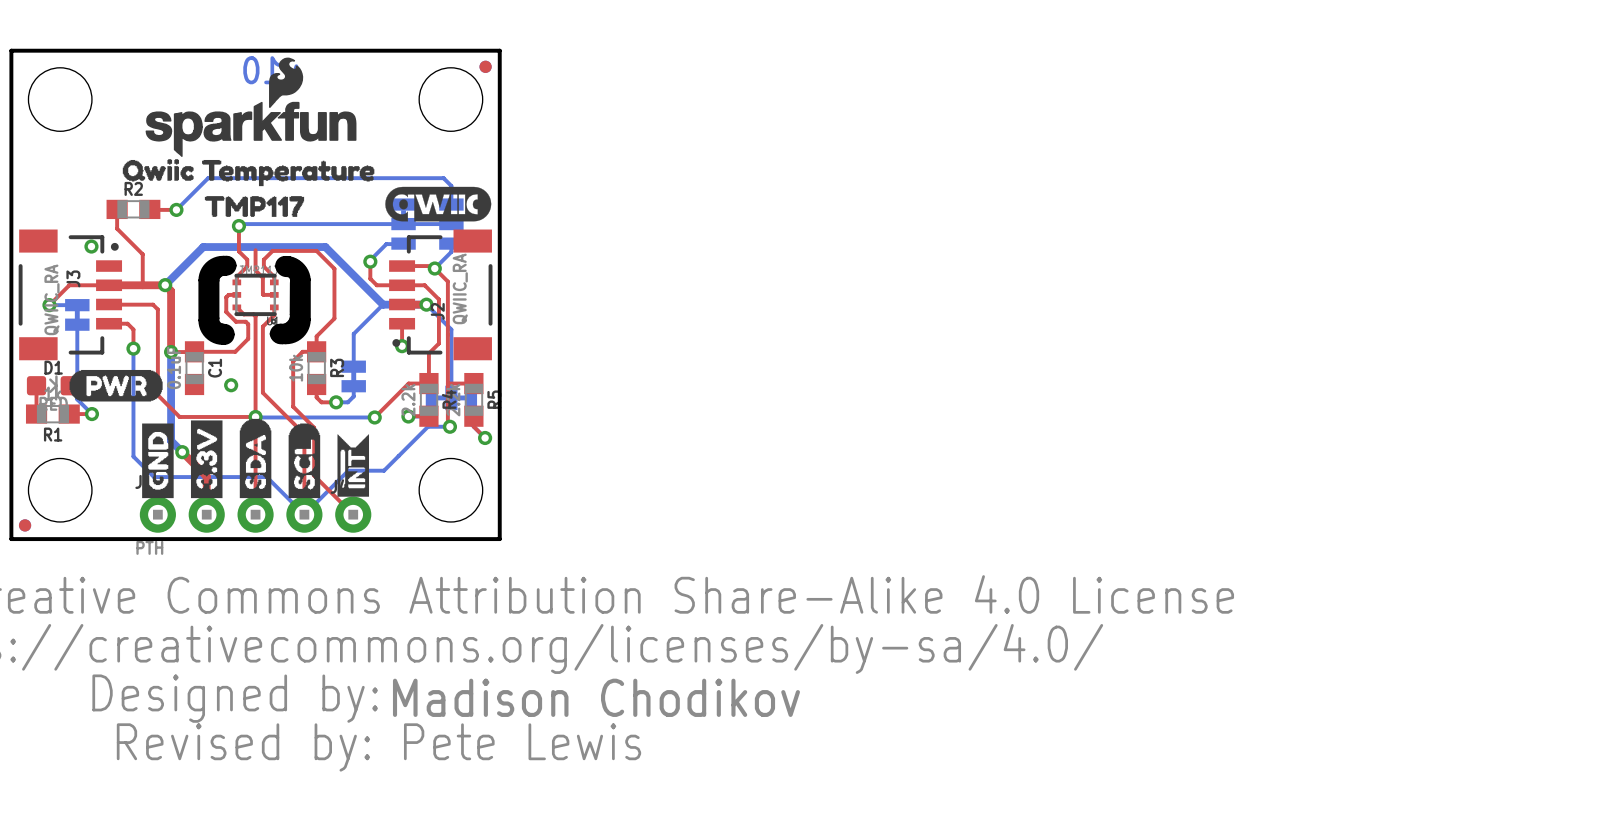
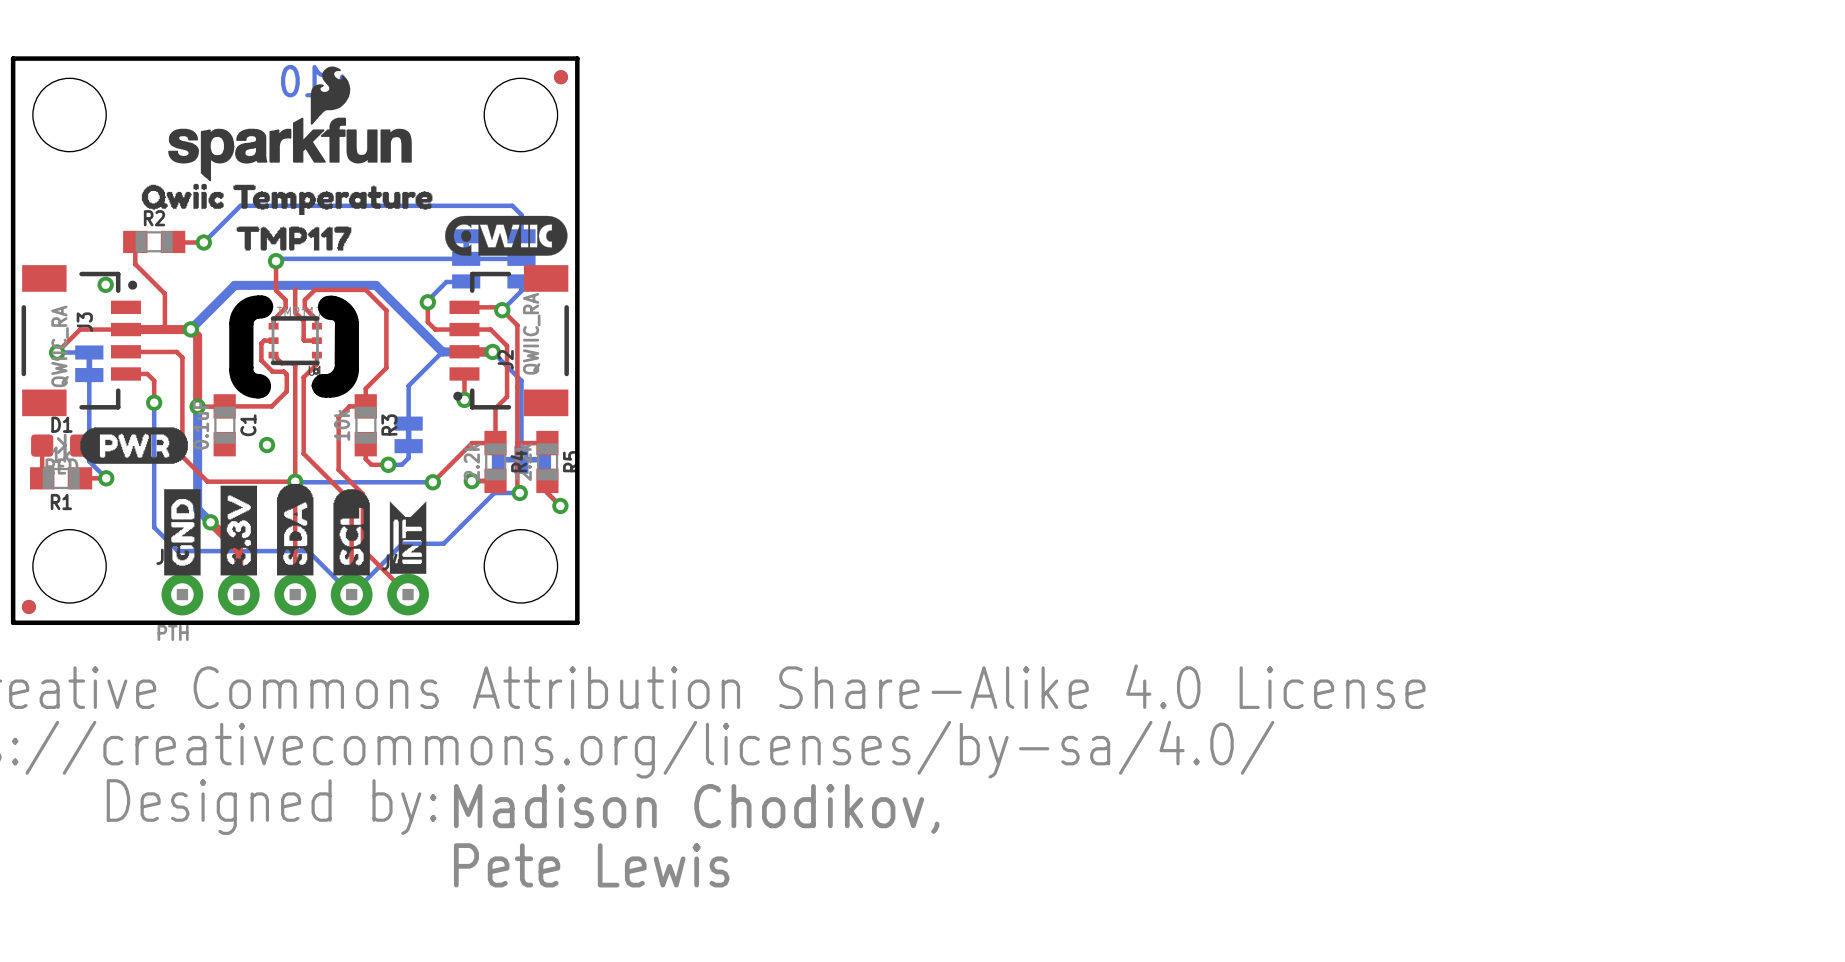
text: Madison Chodikov (596, 697) -> Madison Chodikov, (696, 808)
text: Revised by: Pete Lewis (378, 747) -> Pete Lewis (591, 865)

